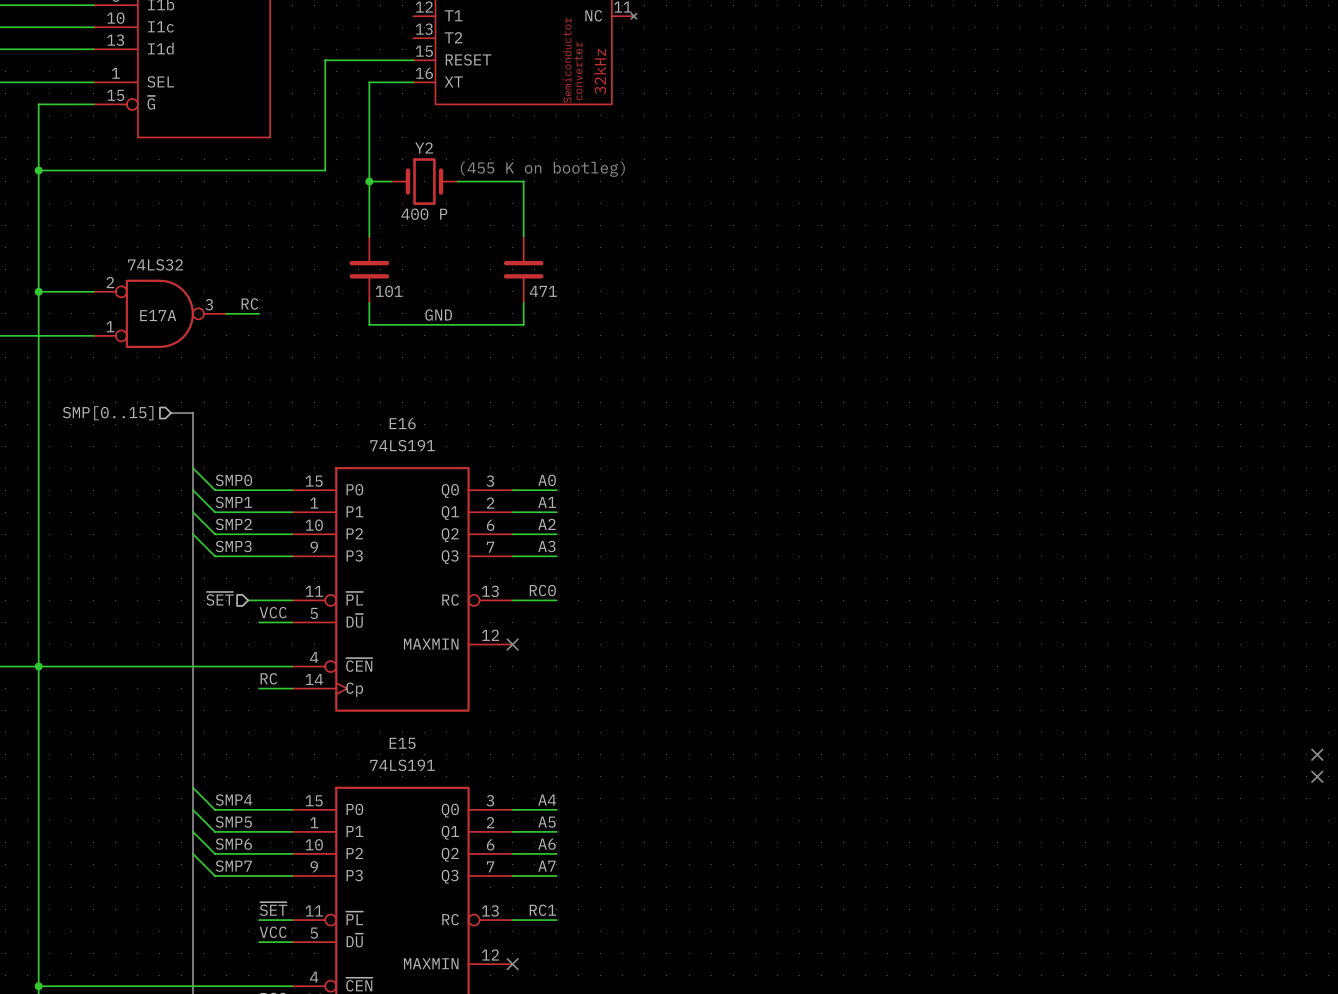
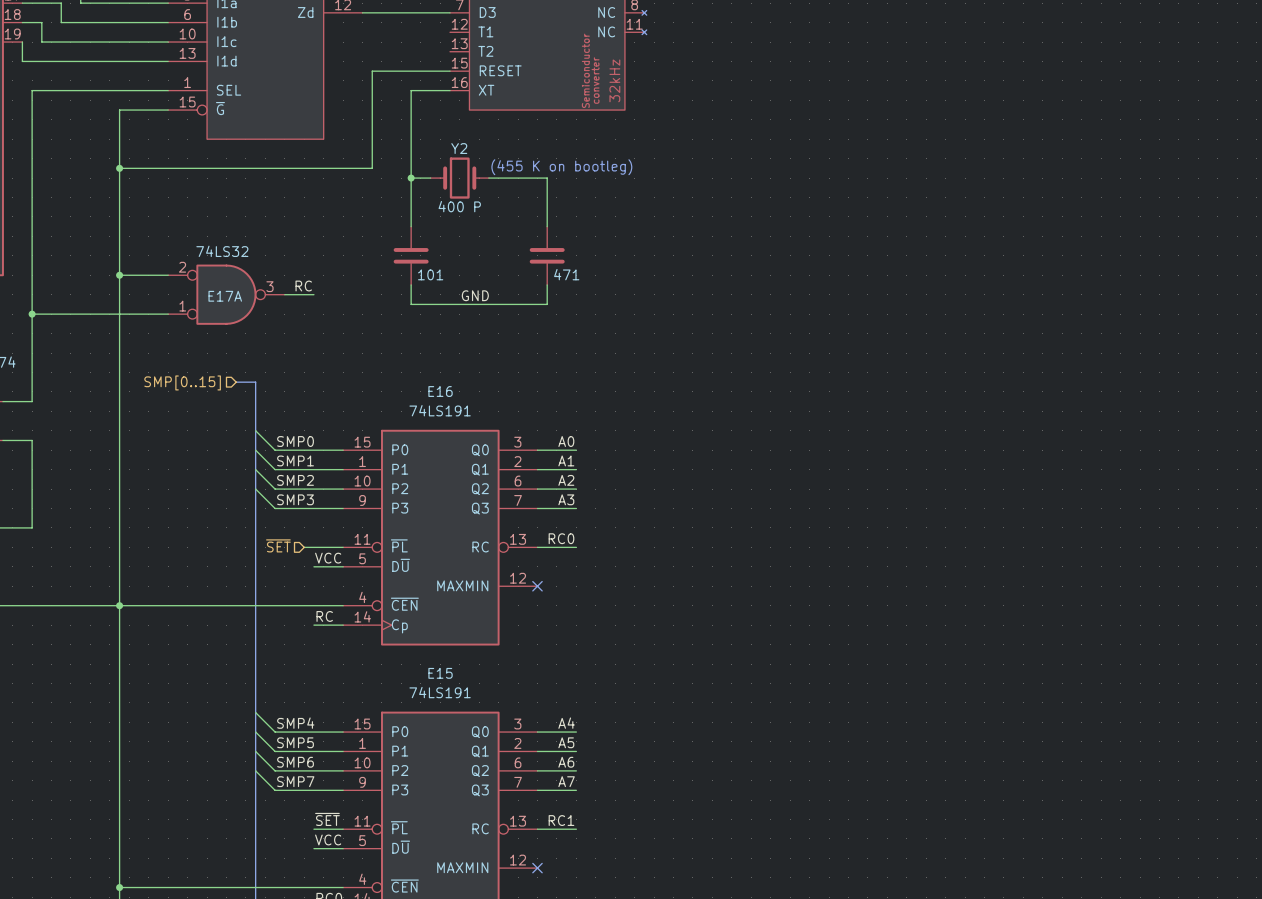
no-connect mark: (1317, 754) -> none
no-connect mark: (1317, 776) -> none

